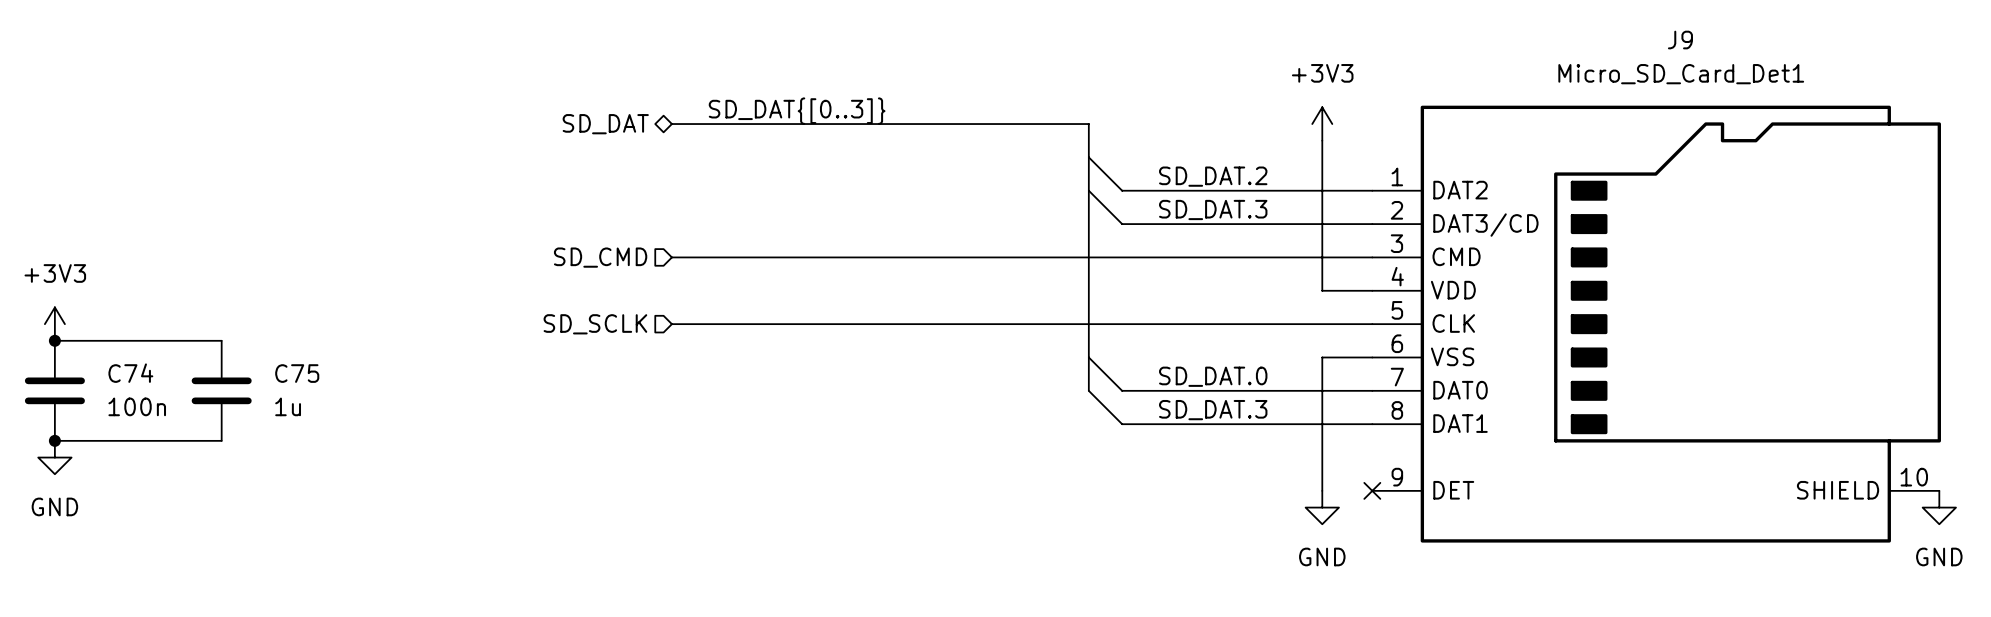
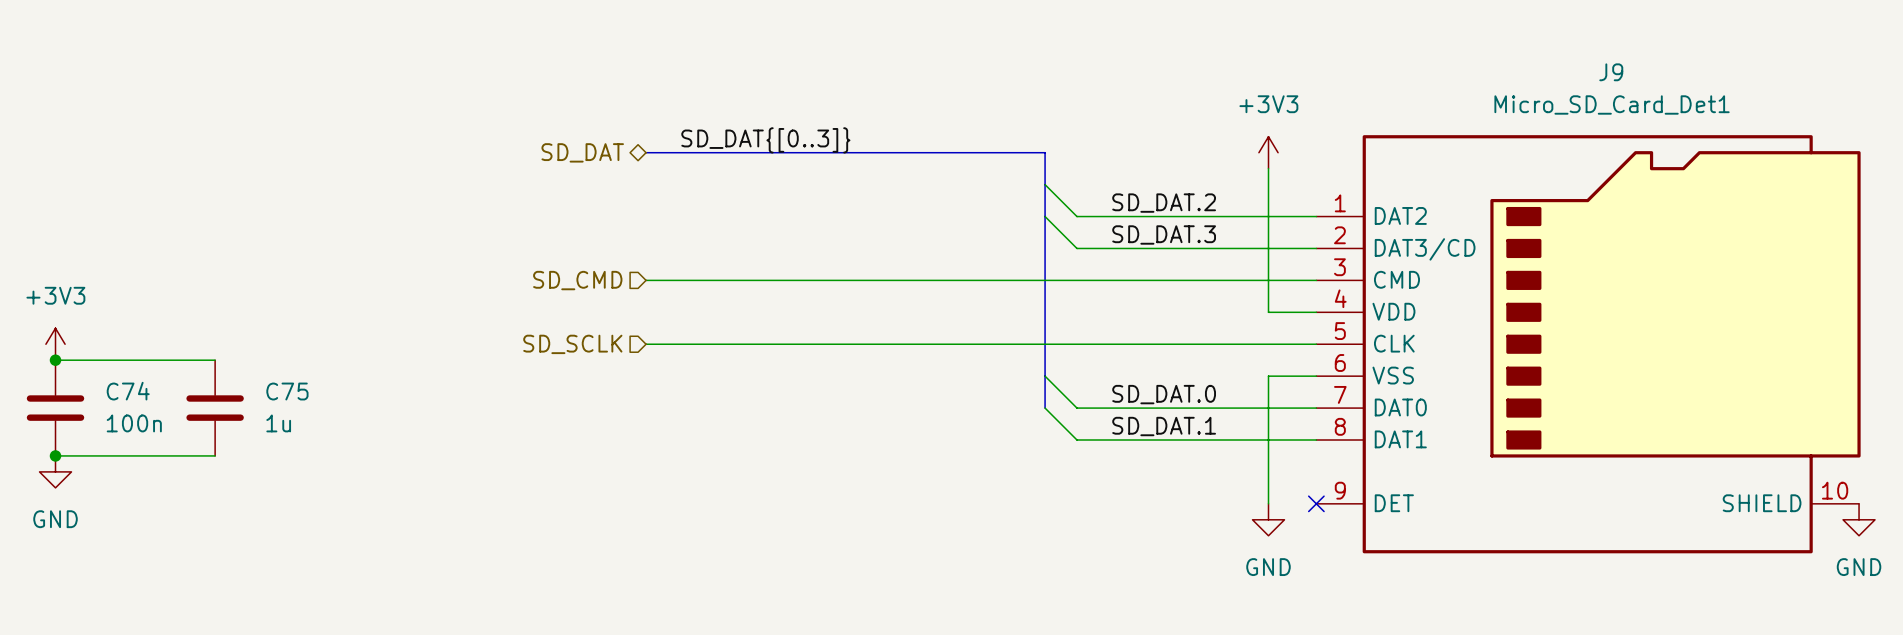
label: SD_DAT.3 (1213, 410) -> SD_DAT.1 (1164, 426)

